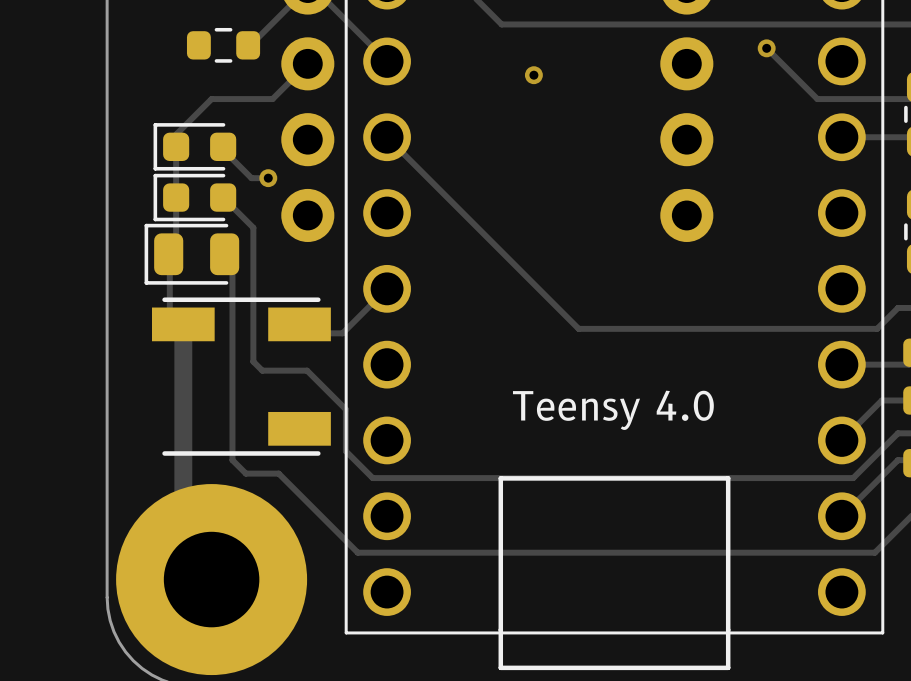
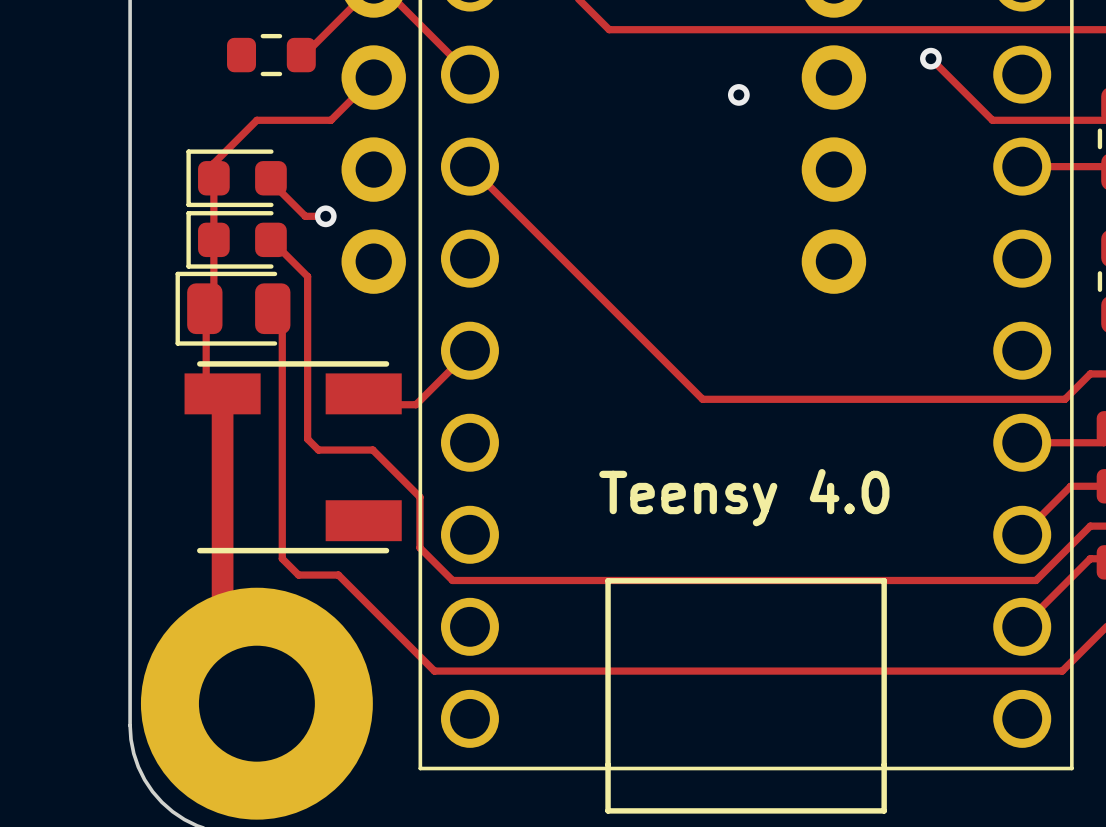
via position: (533, 75) -> (738, 94)

